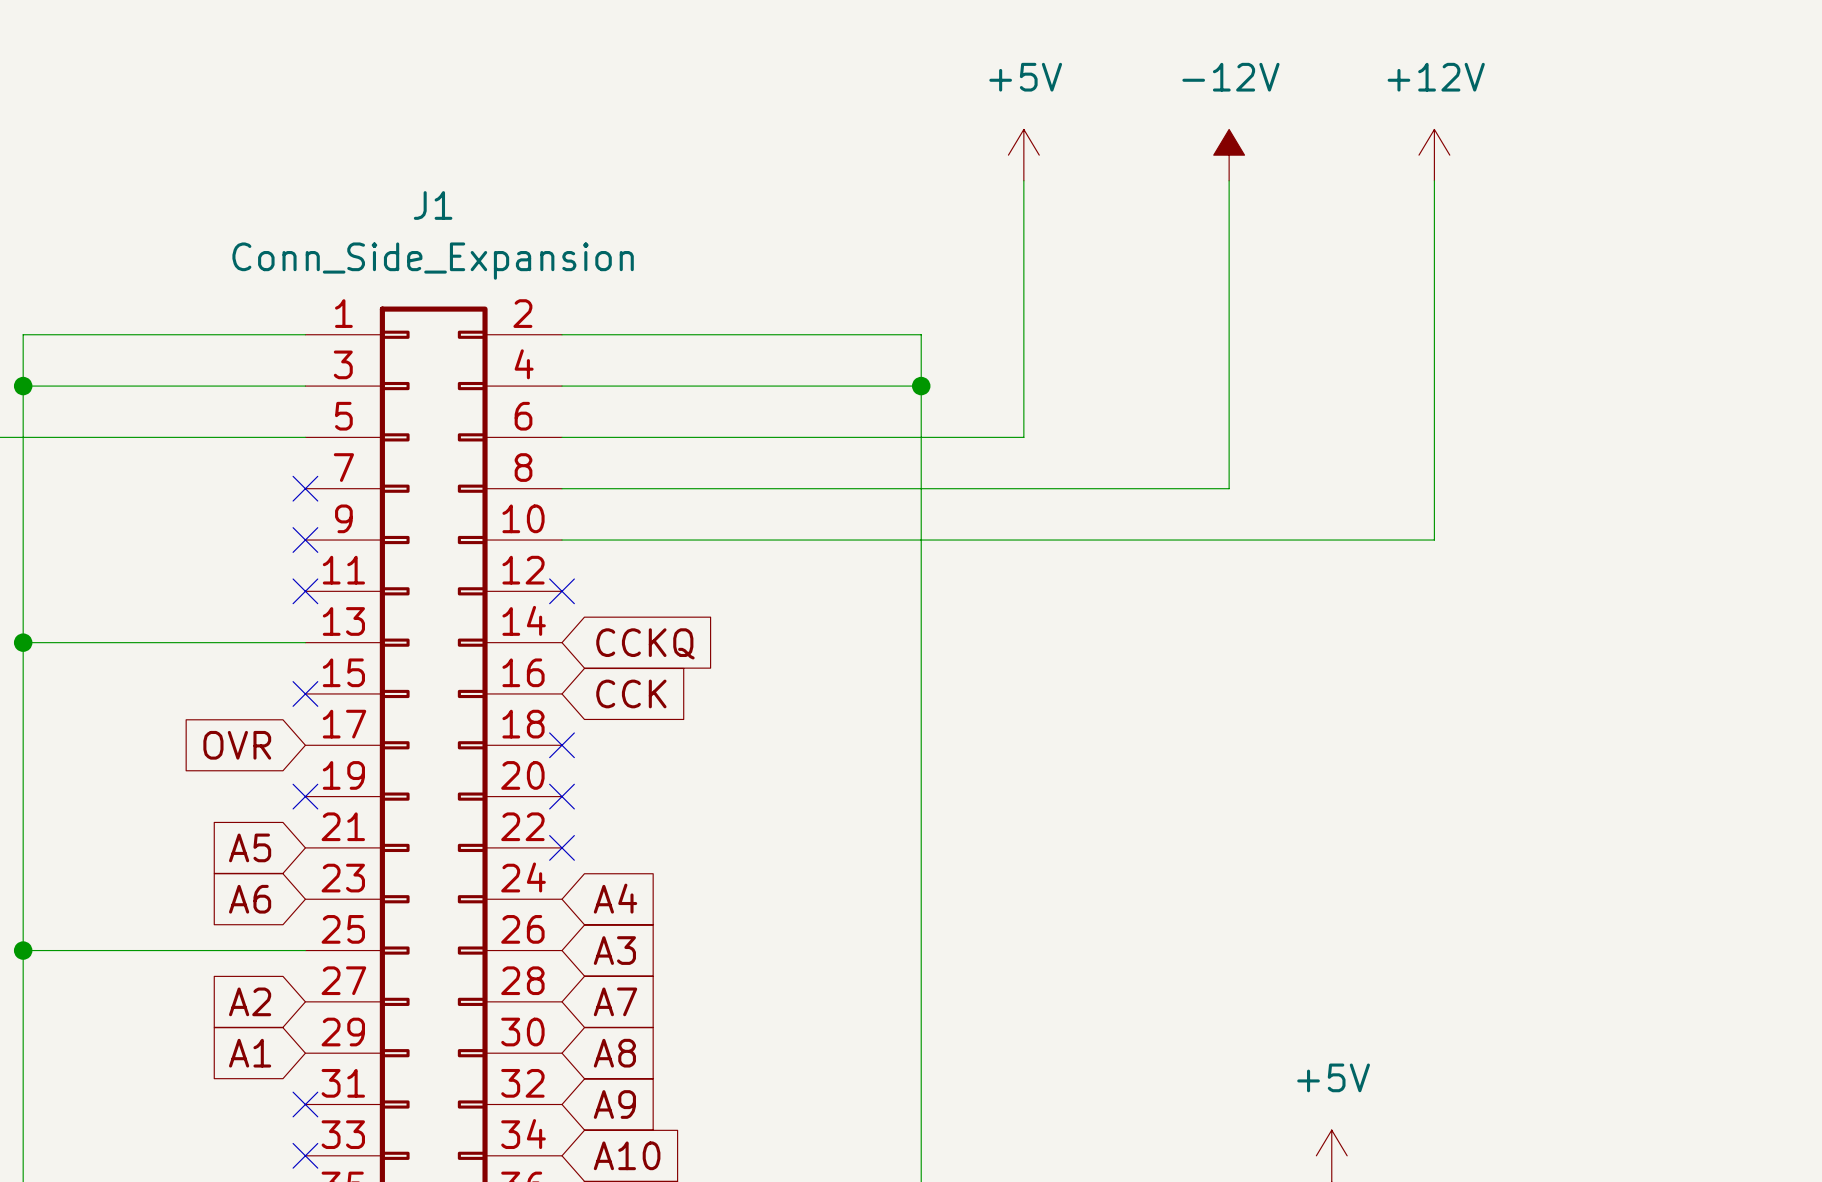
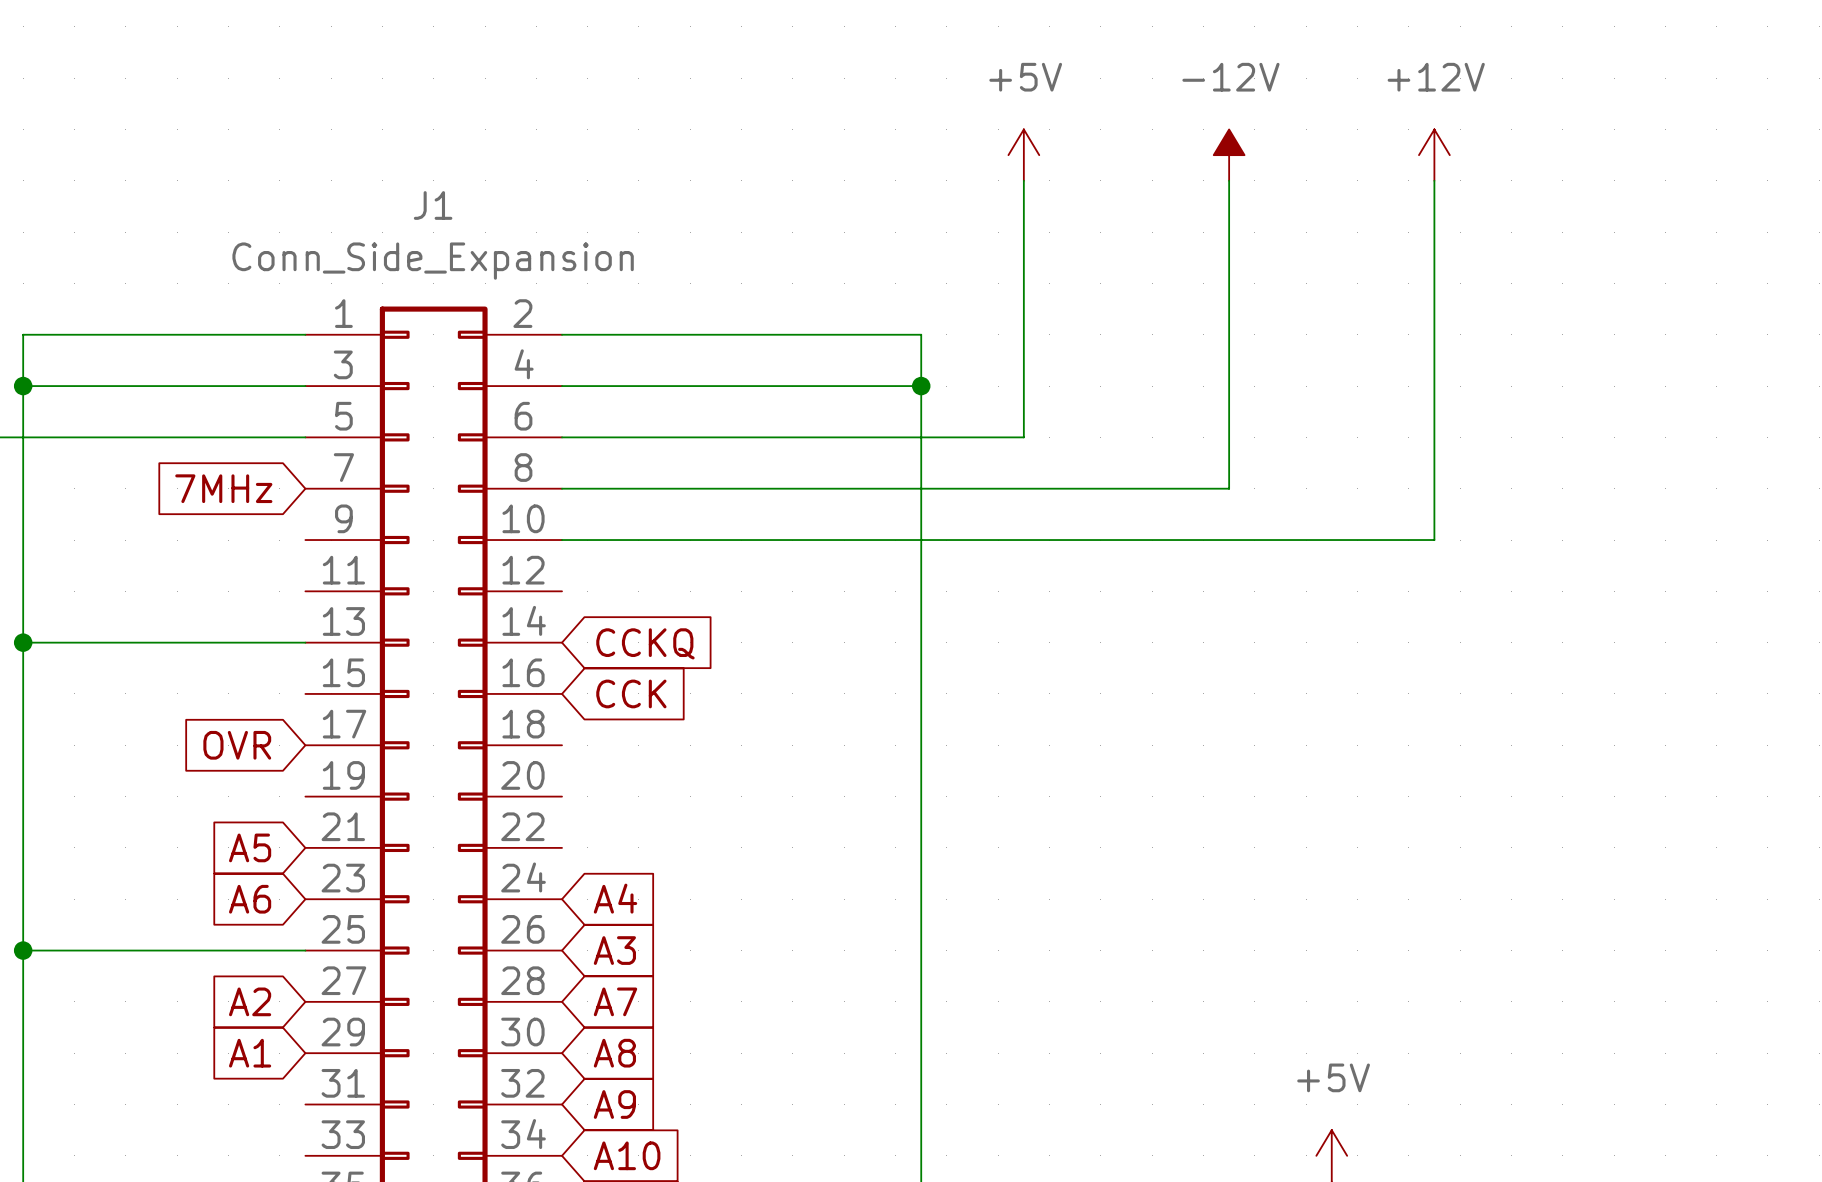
global label: none -> 7MHz (223, 488)
no-connect mark: (305, 488) -> none
no-connect mark: (305, 540) -> none
no-connect mark: (305, 591) -> none
no-connect mark: (562, 591) -> none
no-connect mark: (305, 693) -> none
no-connect mark: (562, 745) -> none
no-connect mark: (305, 796) -> none
no-connect mark: (562, 796) -> none
no-connect mark: (562, 847) -> none
no-connect mark: (305, 1104) -> none
no-connect mark: (305, 1155) -> none

